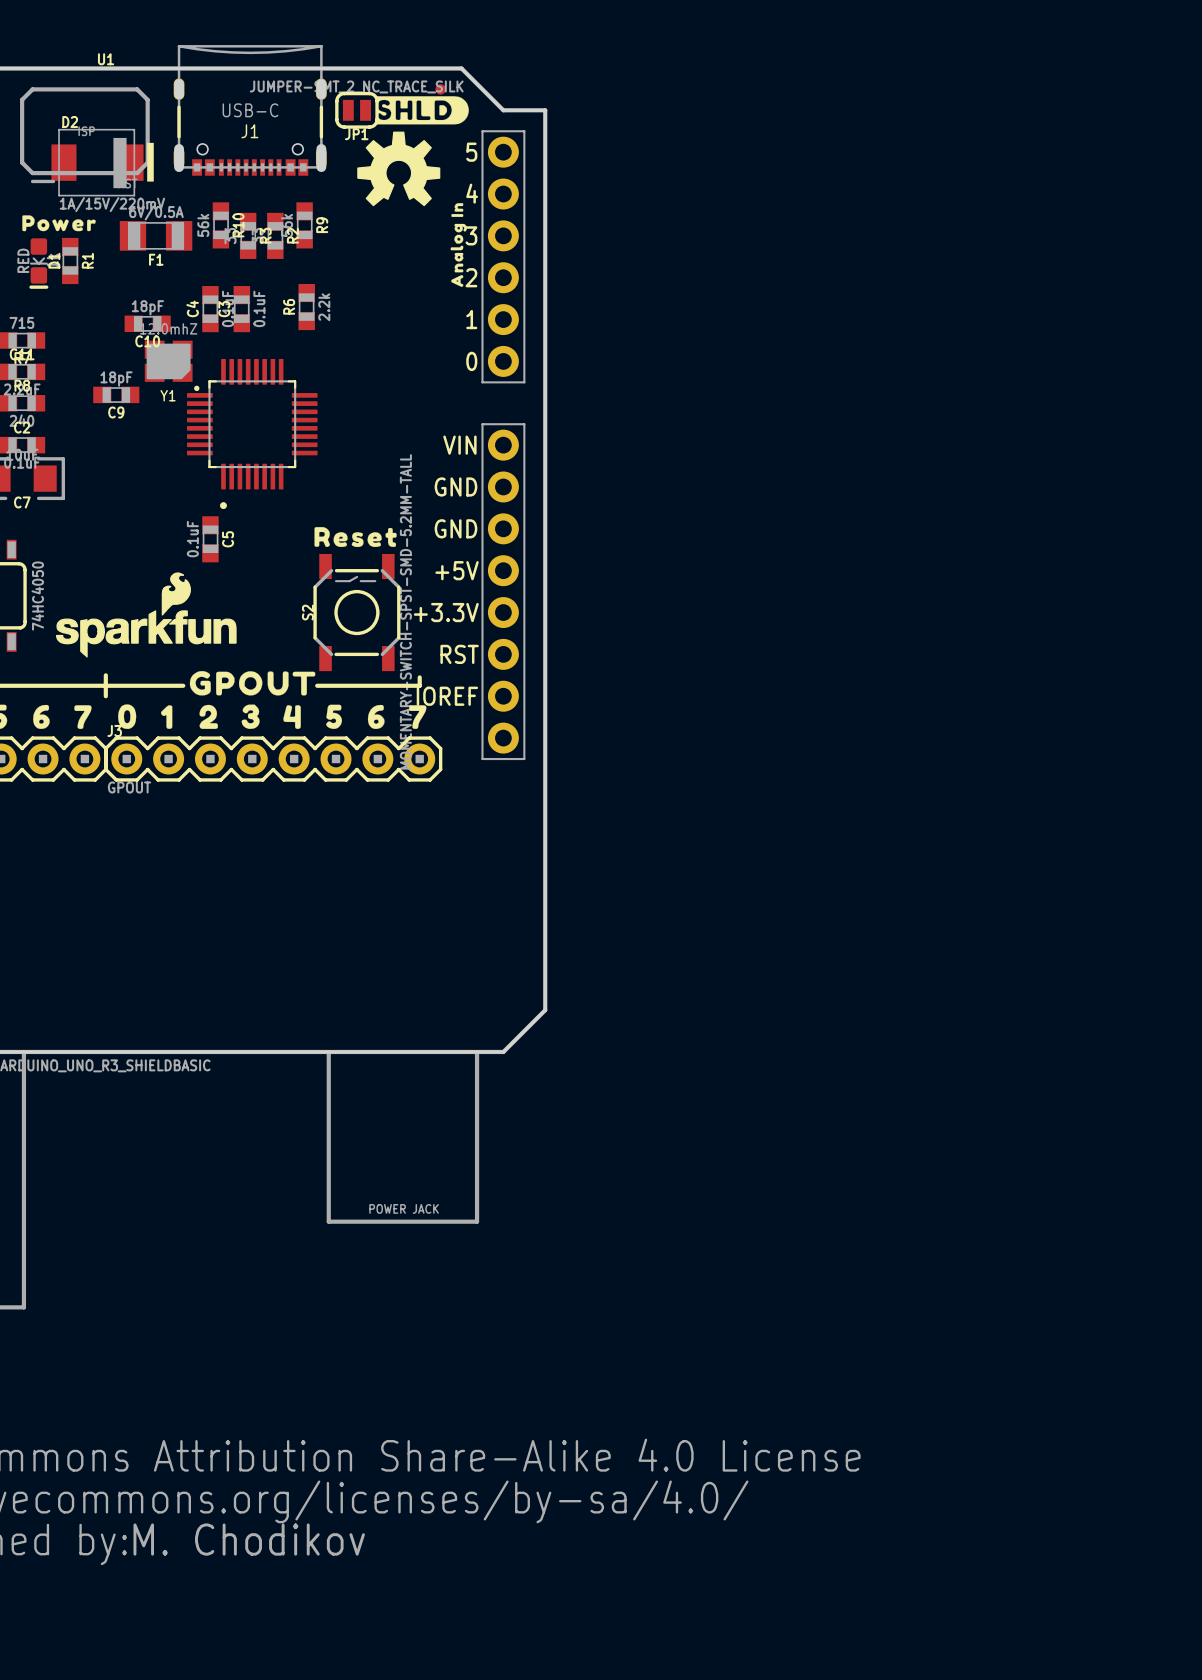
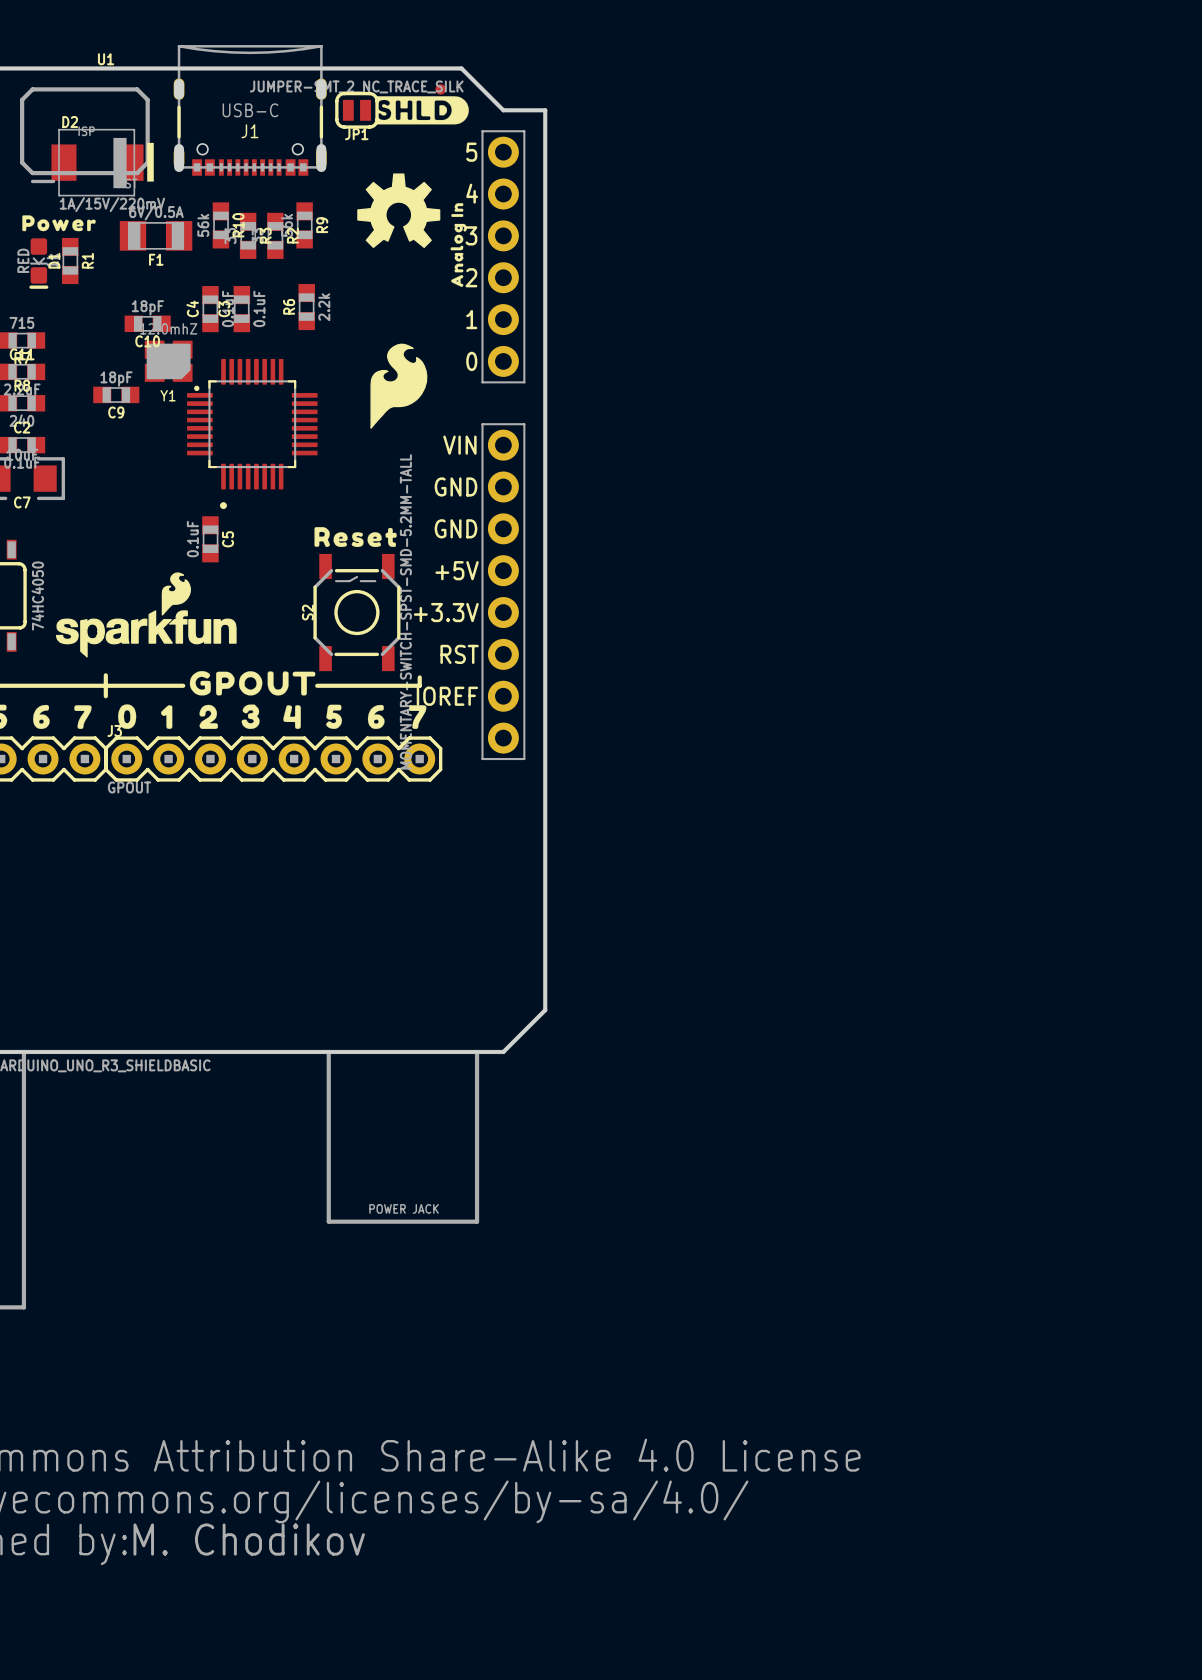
drawing position: (398, 168) -> (398, 210)
drawing: none -> [370, 343, 428, 429]

